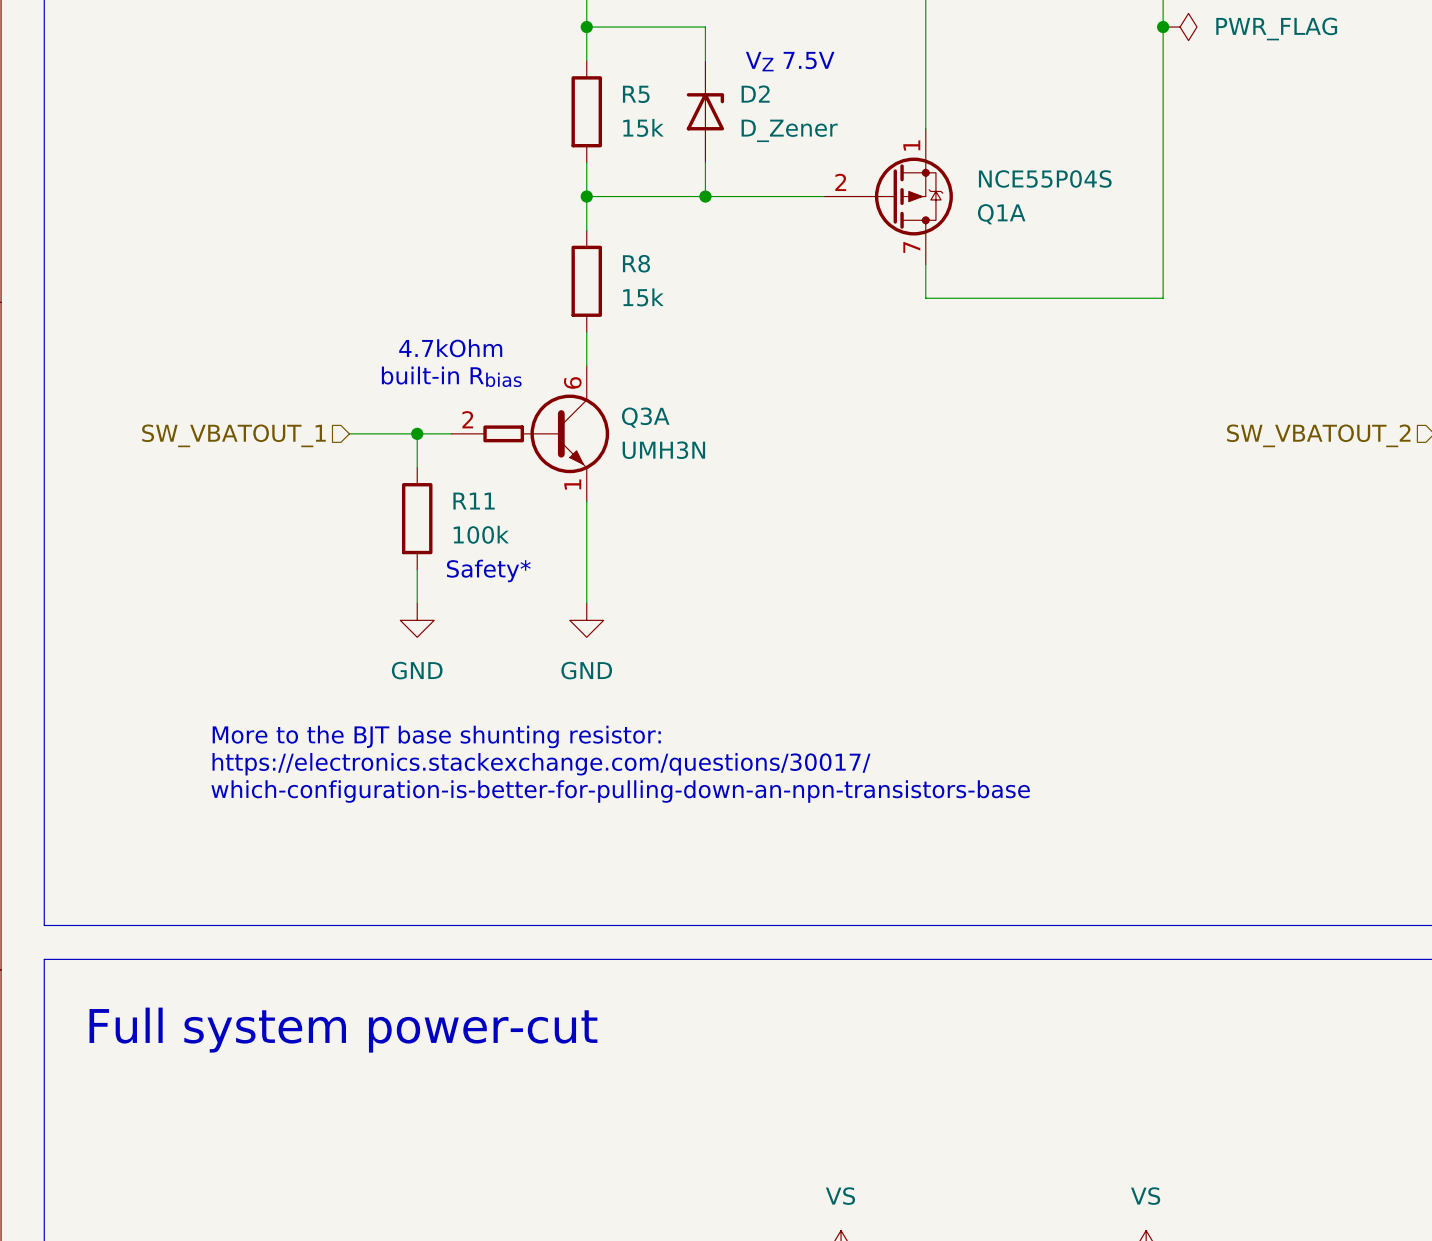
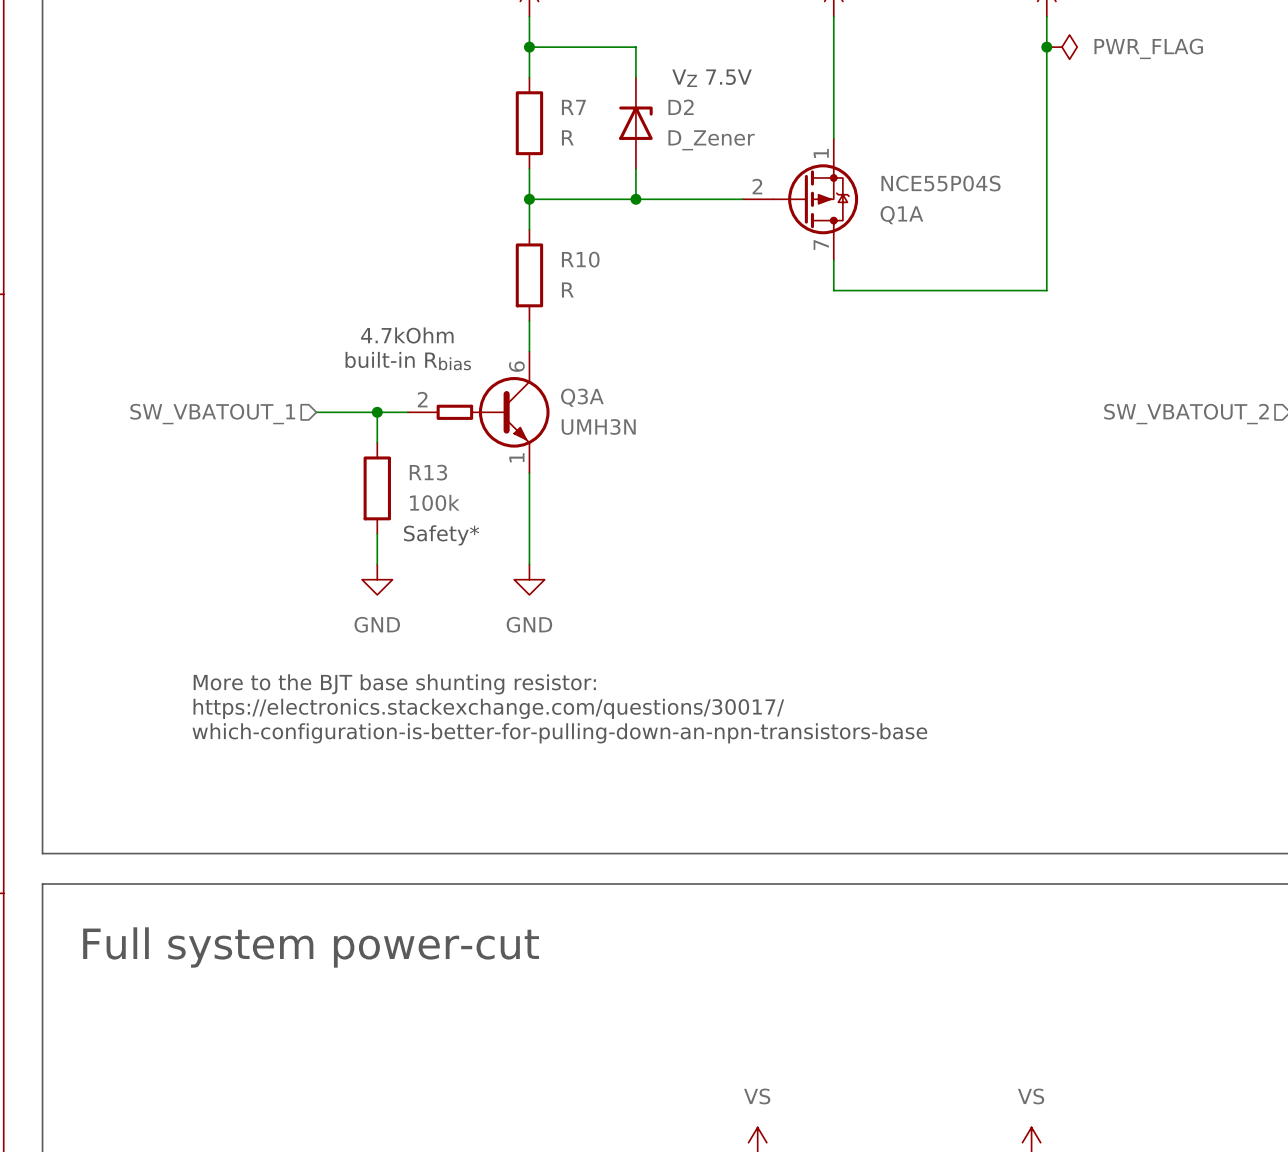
R5 name: R5 (636, 94) -> R7 (573, 107)
R5 value: 15k (643, 127) -> R (567, 137)
R8 name: R8 (636, 263) -> R10 (580, 259)
R8 value: 15k (643, 297) -> R (567, 290)
R11 name: R11 (474, 501) -> R13 (428, 472)

